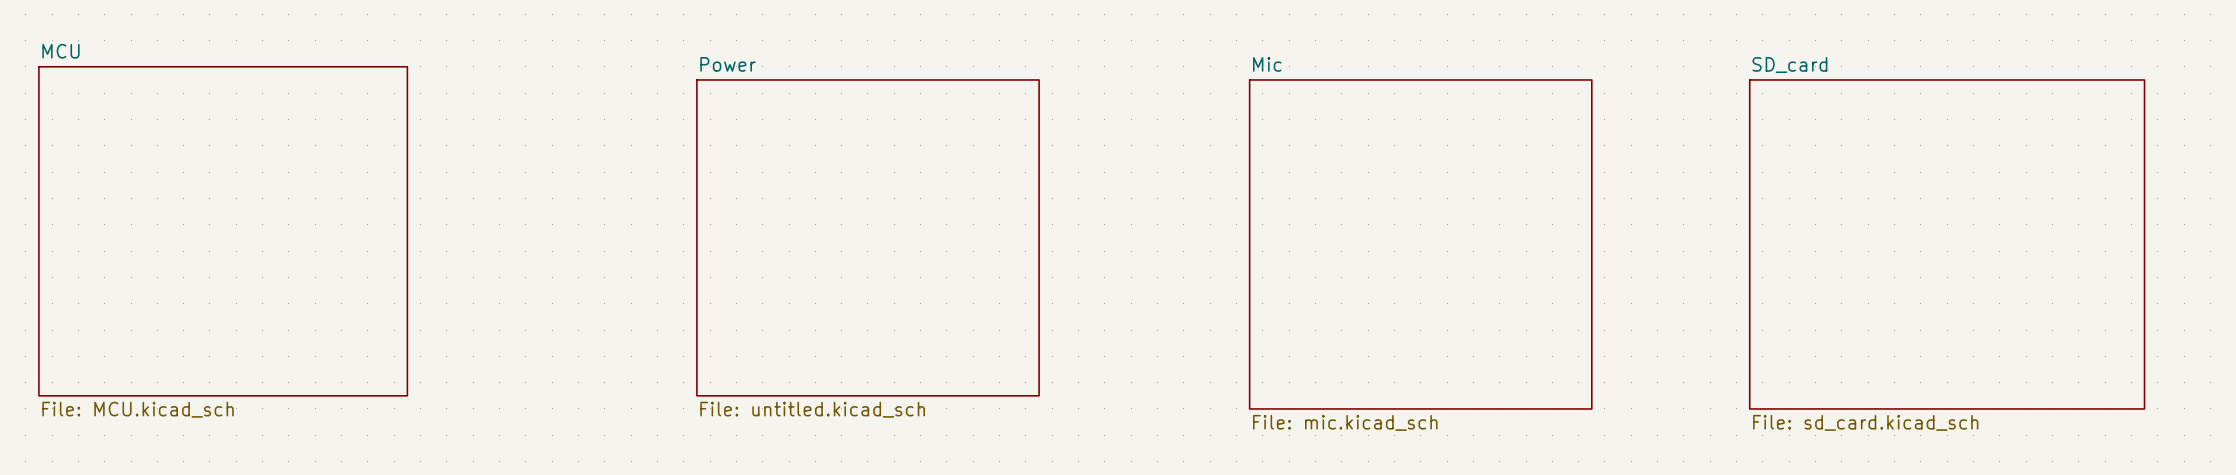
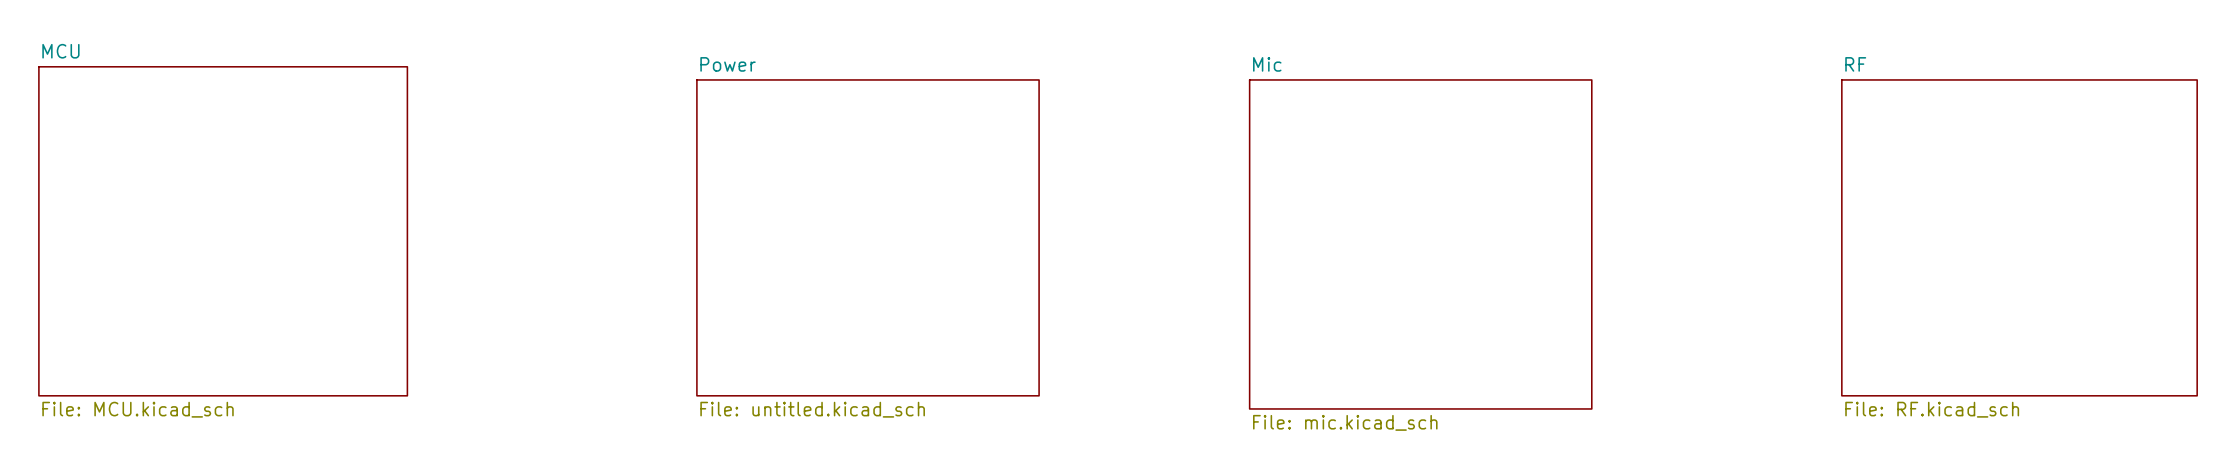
sheet RF: none -> File: RF.kicad_sch (2019, 237)
sheet SD_card: File: sd_card.kicad_sch (1947, 244) -> none

